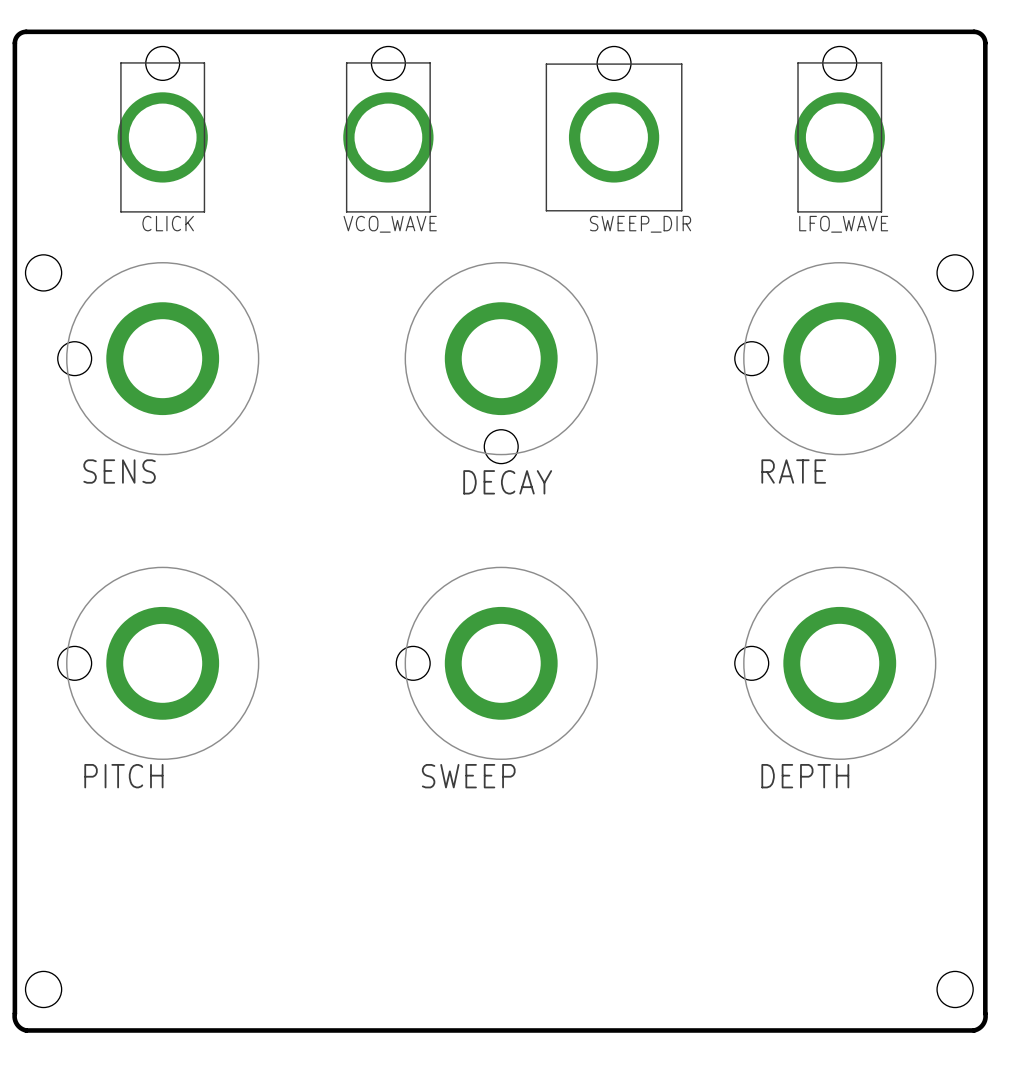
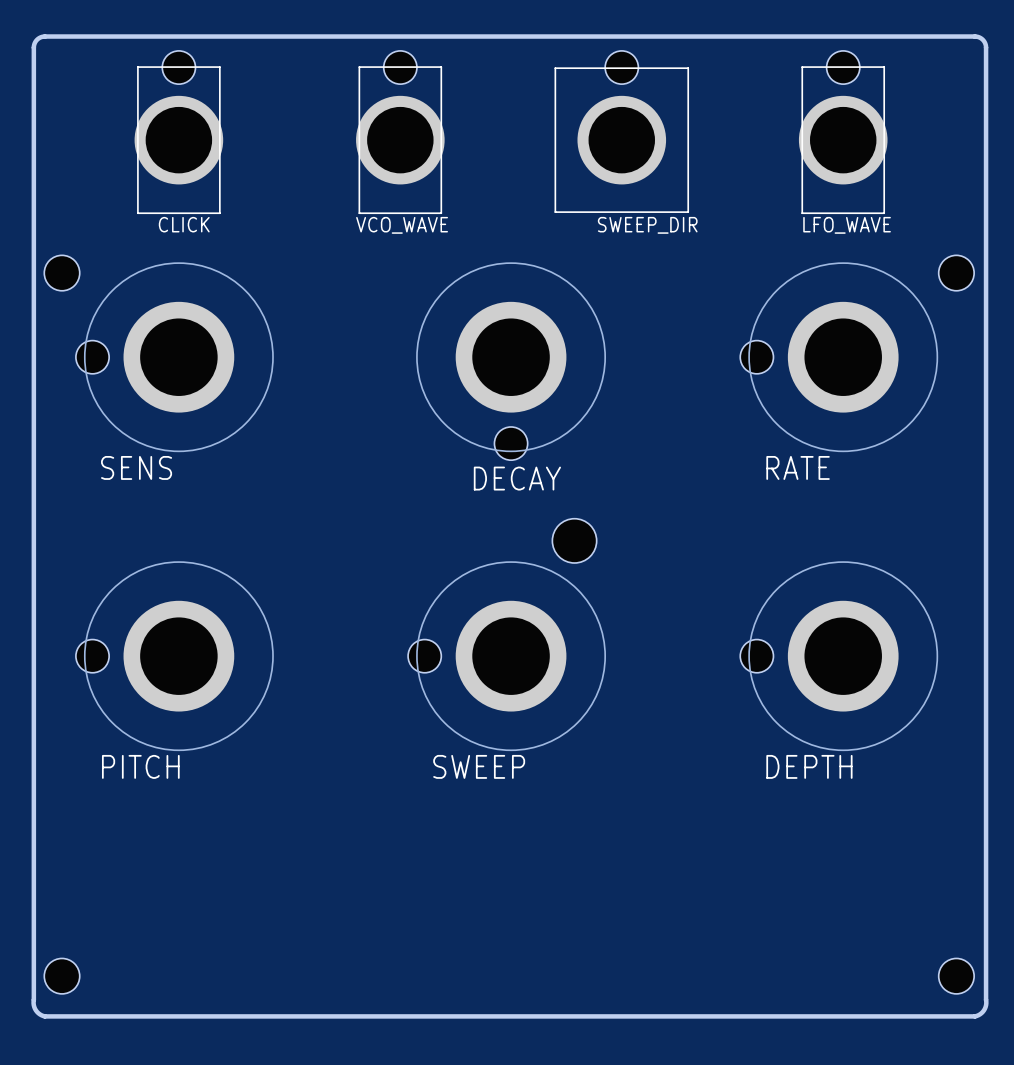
hole: none -> (574, 540)

